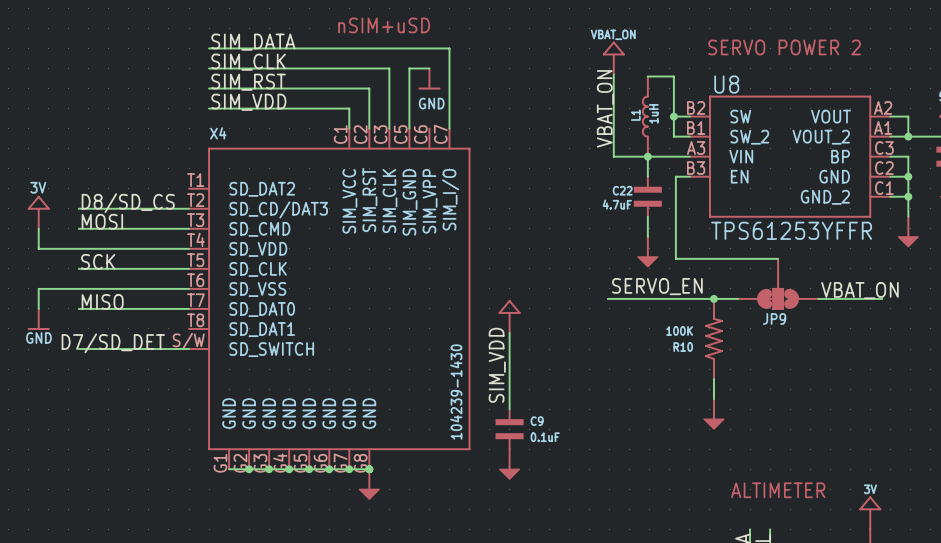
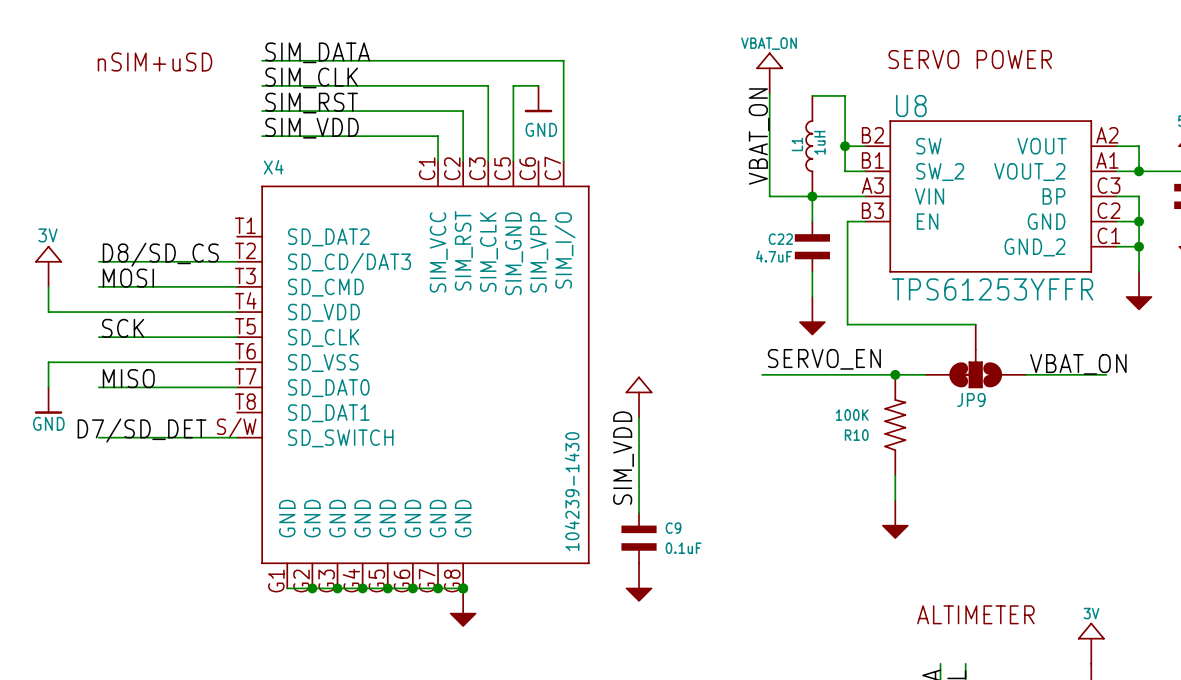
text: nSIM+uSD (384, 25) -> none
text: SERVO POWER 2 (784, 47) -> SERVO POWER (970, 59)
text: none -> nSIM+uSD (155, 62)

